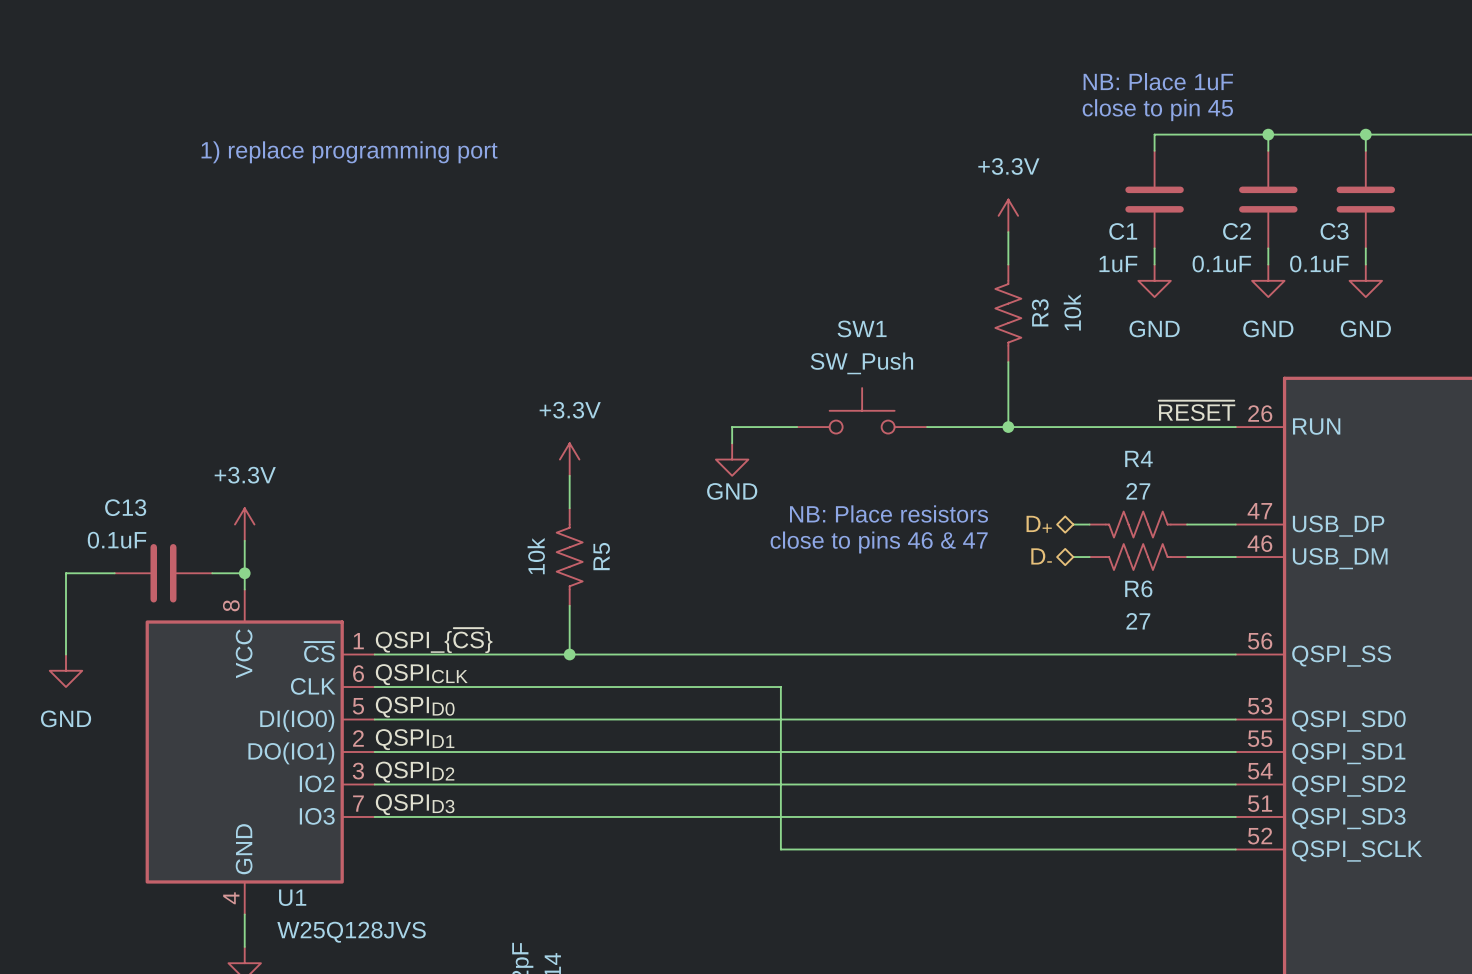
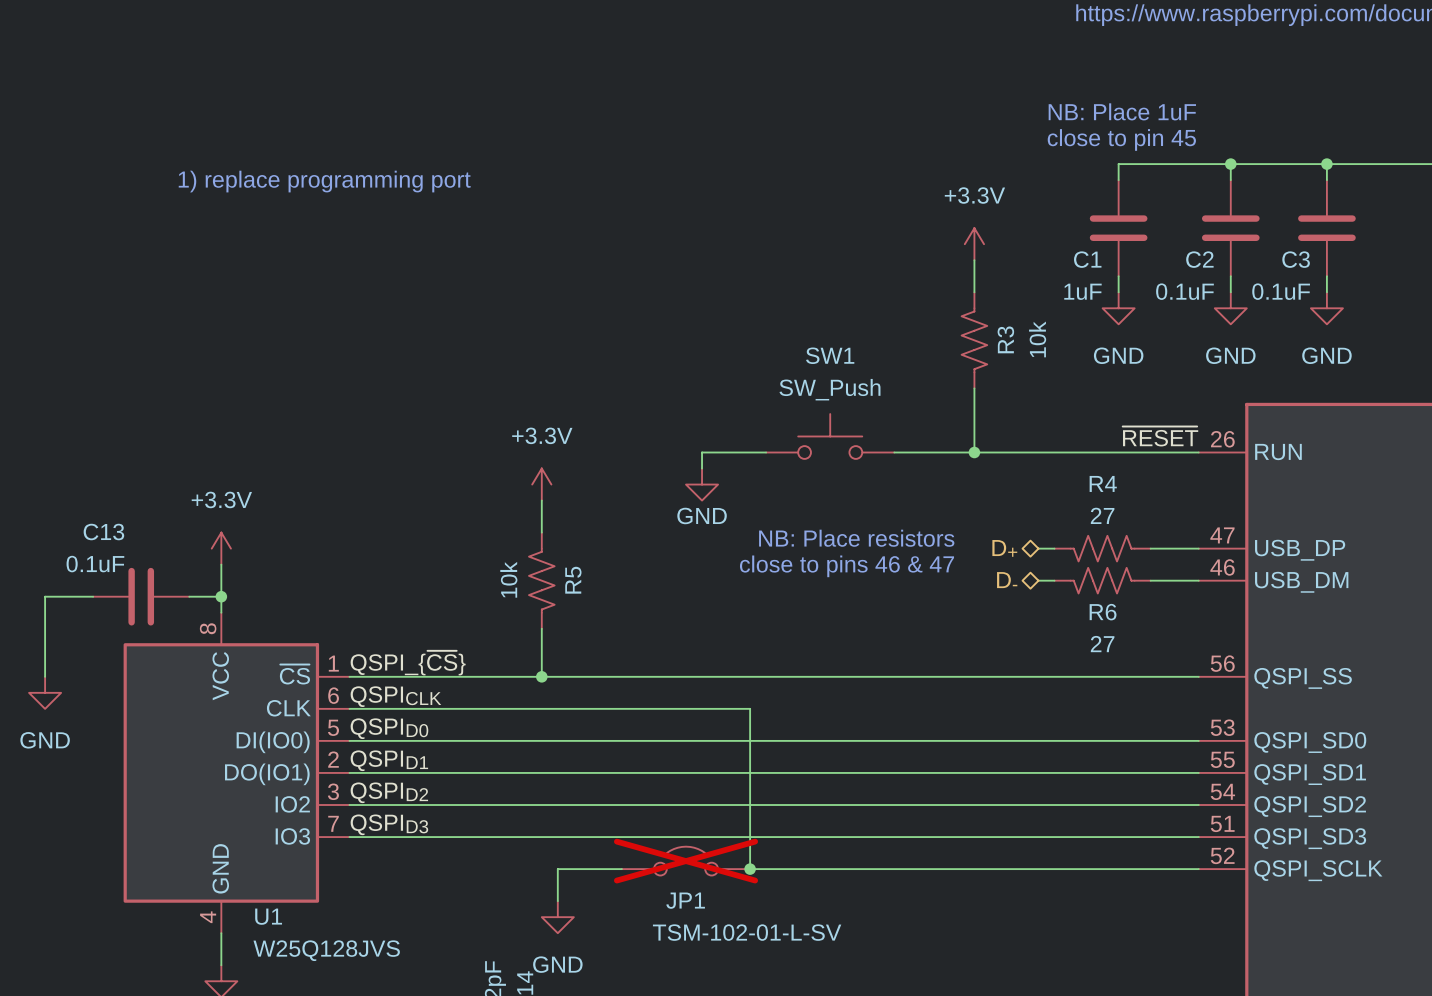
JP1: none -> TSM-102-01-L-SV (686, 861)
wire: none -> (621, 869) (557, 869) (557, 901)
junction: none -> (750, 869)
power symbol: none -> GND (557, 917)

